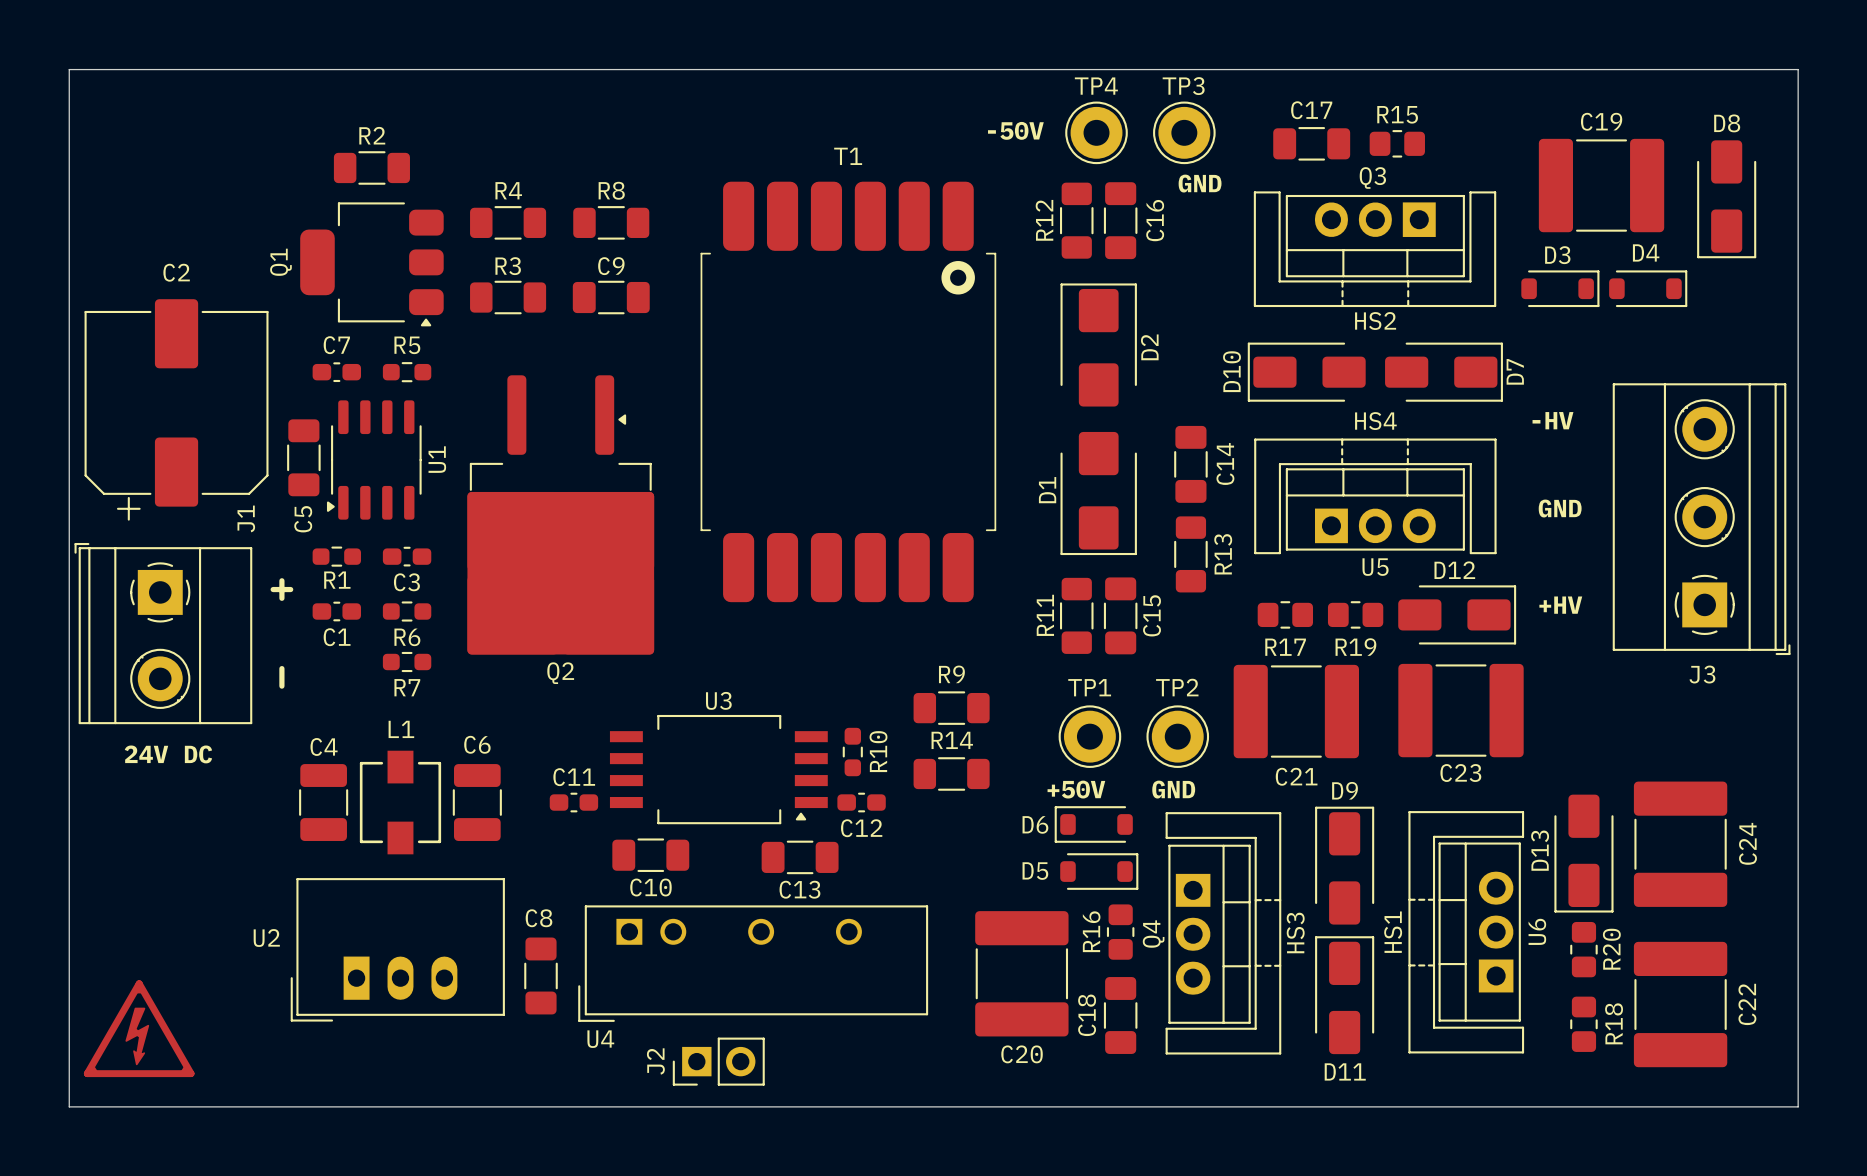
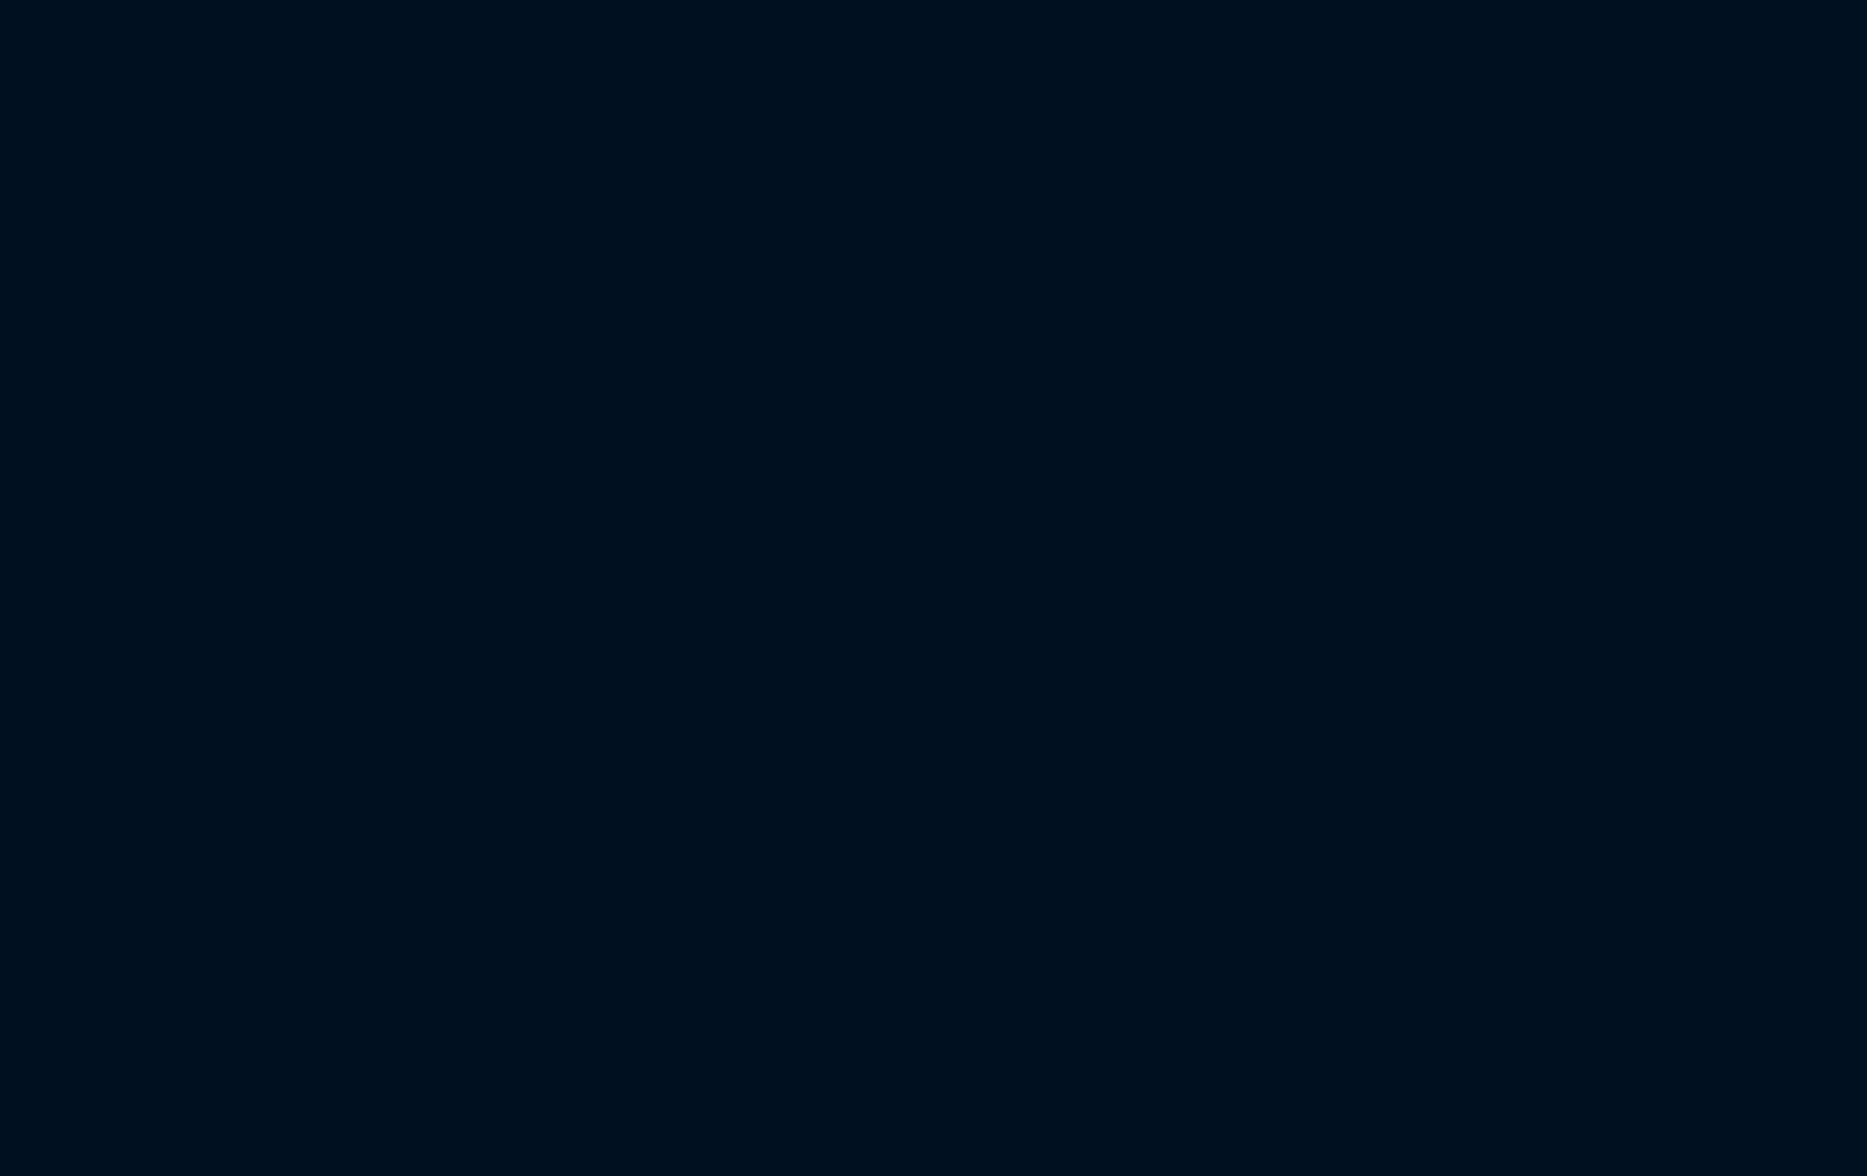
board edge: (69, 69) (1798, 69) (1798, 1106) (69, 1106) (69, 69) -> none
text: -50V (1015, 130) -> none
TP4: (1096, 132) -> none
TP3: (1184, 132) -> none
C17: (1311, 143) -> none
R15: (1397, 143) -> none
R2: (371, 167) -> none
text: GND (1200, 183) -> none
C19: (1601, 185) -> none
D8: (1726, 199) -> none
R12: (1076, 220) -> none
C16: (1120, 220) -> none
R4: (508, 222) -> none
R8: (611, 222) -> none
Q3: (1375, 236) -> none
HS2: (1375, 249) -> none
Q1: (371, 264) -> none
D3: (1560, 288) -> none
D4: (1648, 288) -> none
R3: (508, 297) -> none
C9: (611, 297) -> none
D2: (1098, 344) -> none
C7: (336, 372) -> none
R5: (407, 372) -> none
D10: (1306, 372) -> none
D7: (1444, 372) -> none
T1: (848, 391) -> none
C2: (176, 409) -> none
text: -HV (1552, 420) -> none
C5: (303, 457) -> none
U1: (374, 459) -> none
C14: (1190, 464) -> none
D1: (1098, 493) -> none
HS4: (1375, 496) -> none
text: GND (1560, 508) -> none
U5: (1375, 509) -> none
Q2: (560, 514) -> none
J3: (1701, 519) -> none
R13: (1190, 554) -> none
R1: (336, 556) -> none
C3: (407, 556) -> none
line: (281, 580) (281, 598) -> none
line: (273, 589) (290, 589) -> none
text: +HV (1560, 605) -> none
C1: (336, 611) -> none
R6: (407, 611) -> none
R17: (1285, 614) -> none
R19: (1355, 614) -> none
D12: (1457, 614) -> none
R11: (1076, 615) -> none
C15: (1120, 615) -> none
J1: (163, 633) -> none
R7: (407, 662) -> none
line: (281, 668) (281, 686) -> none
R9: (951, 708) -> none
C23: (1461, 710) -> none
C21: (1296, 711) -> none
TP1: (1089, 736) -> none
TP2: (1177, 736) -> none
R10: (852, 752) -> none
text: 24V DC (168, 754) -> none
U3: (718, 769) -> none
R14: (951, 773) -> none
text: +50V (1076, 789) -> none
text: GND (1173, 789) -> none
C4: (323, 802) -> none
L1: (400, 802) -> none
C6: (477, 802) -> none
C11: (573, 802) -> none
C12: (861, 802) -> none
D6: (1093, 824) -> none
C24: (1680, 844) -> none
D13: (1583, 853) -> none
C10: (650, 855) -> none
C13: (800, 857) -> none
D9: (1344, 865) -> none
D5: (1099, 871) -> none
R16: (1120, 932) -> none
HS1: (1466, 932) -> none
U6: (1479, 932) -> none
HS3: (1223, 933) -> none
Q4: (1209, 934) -> none
U2: (397, 949) -> none
R20: (1583, 949) -> none
U4: (753, 963) -> none
C20: (1021, 973) -> none
C8: (541, 975) -> none
drawing: [83, 980, 195, 1078] -> none
D11: (1344, 995) -> none
C22: (1680, 1004) -> none
C18: (1120, 1015) -> none
R18: (1583, 1024) -> none
J2: (718, 1061) -> none

